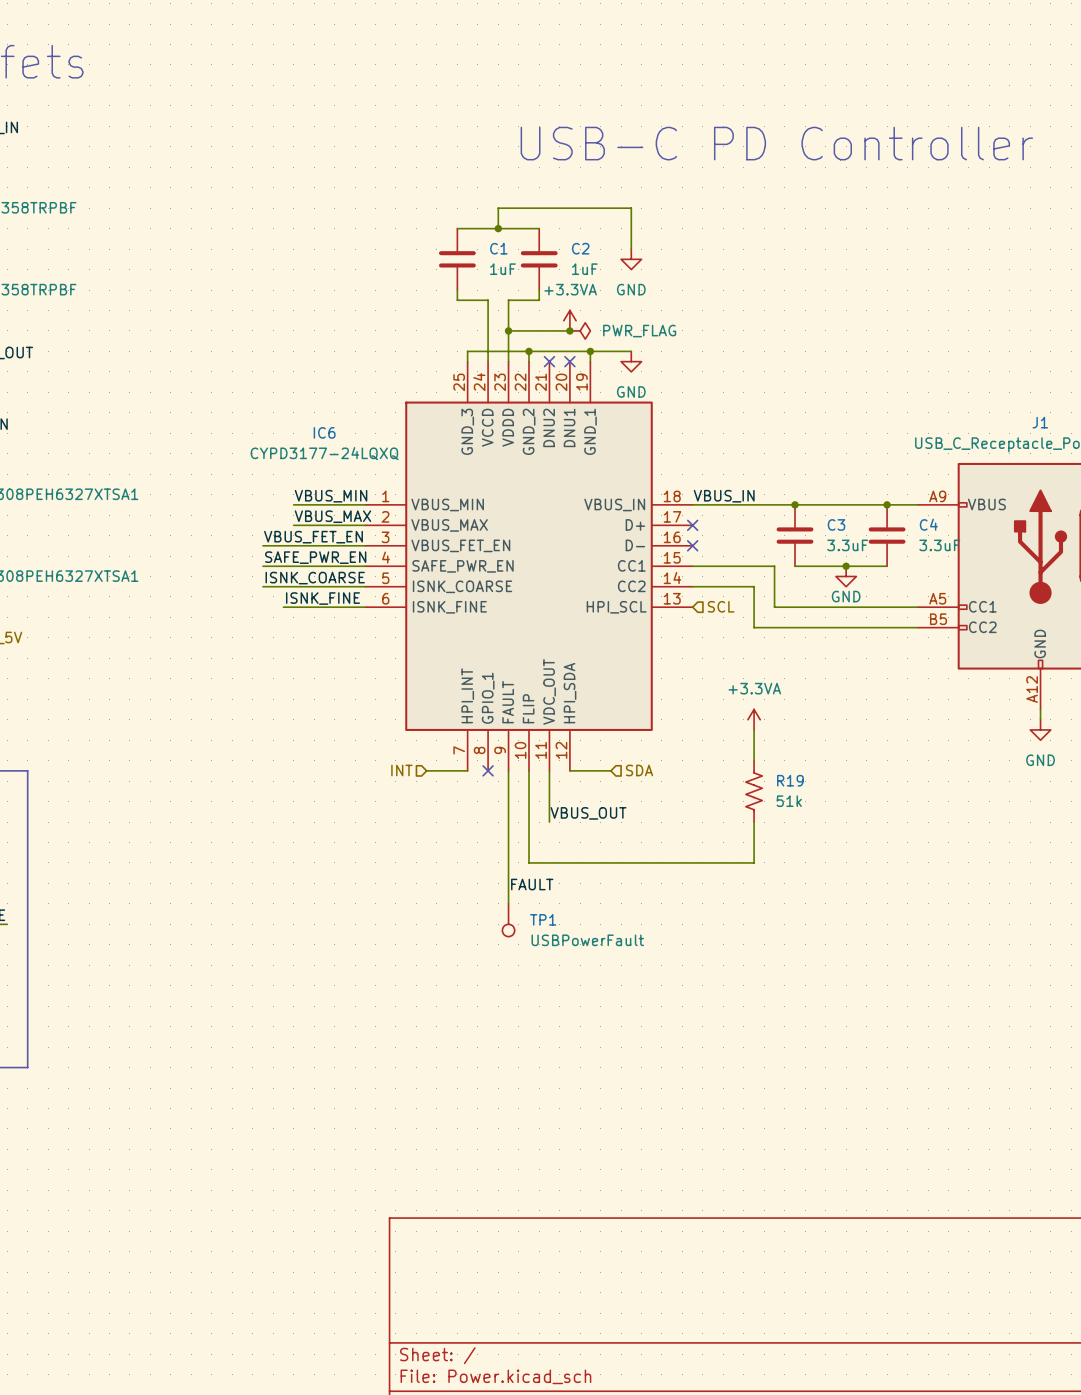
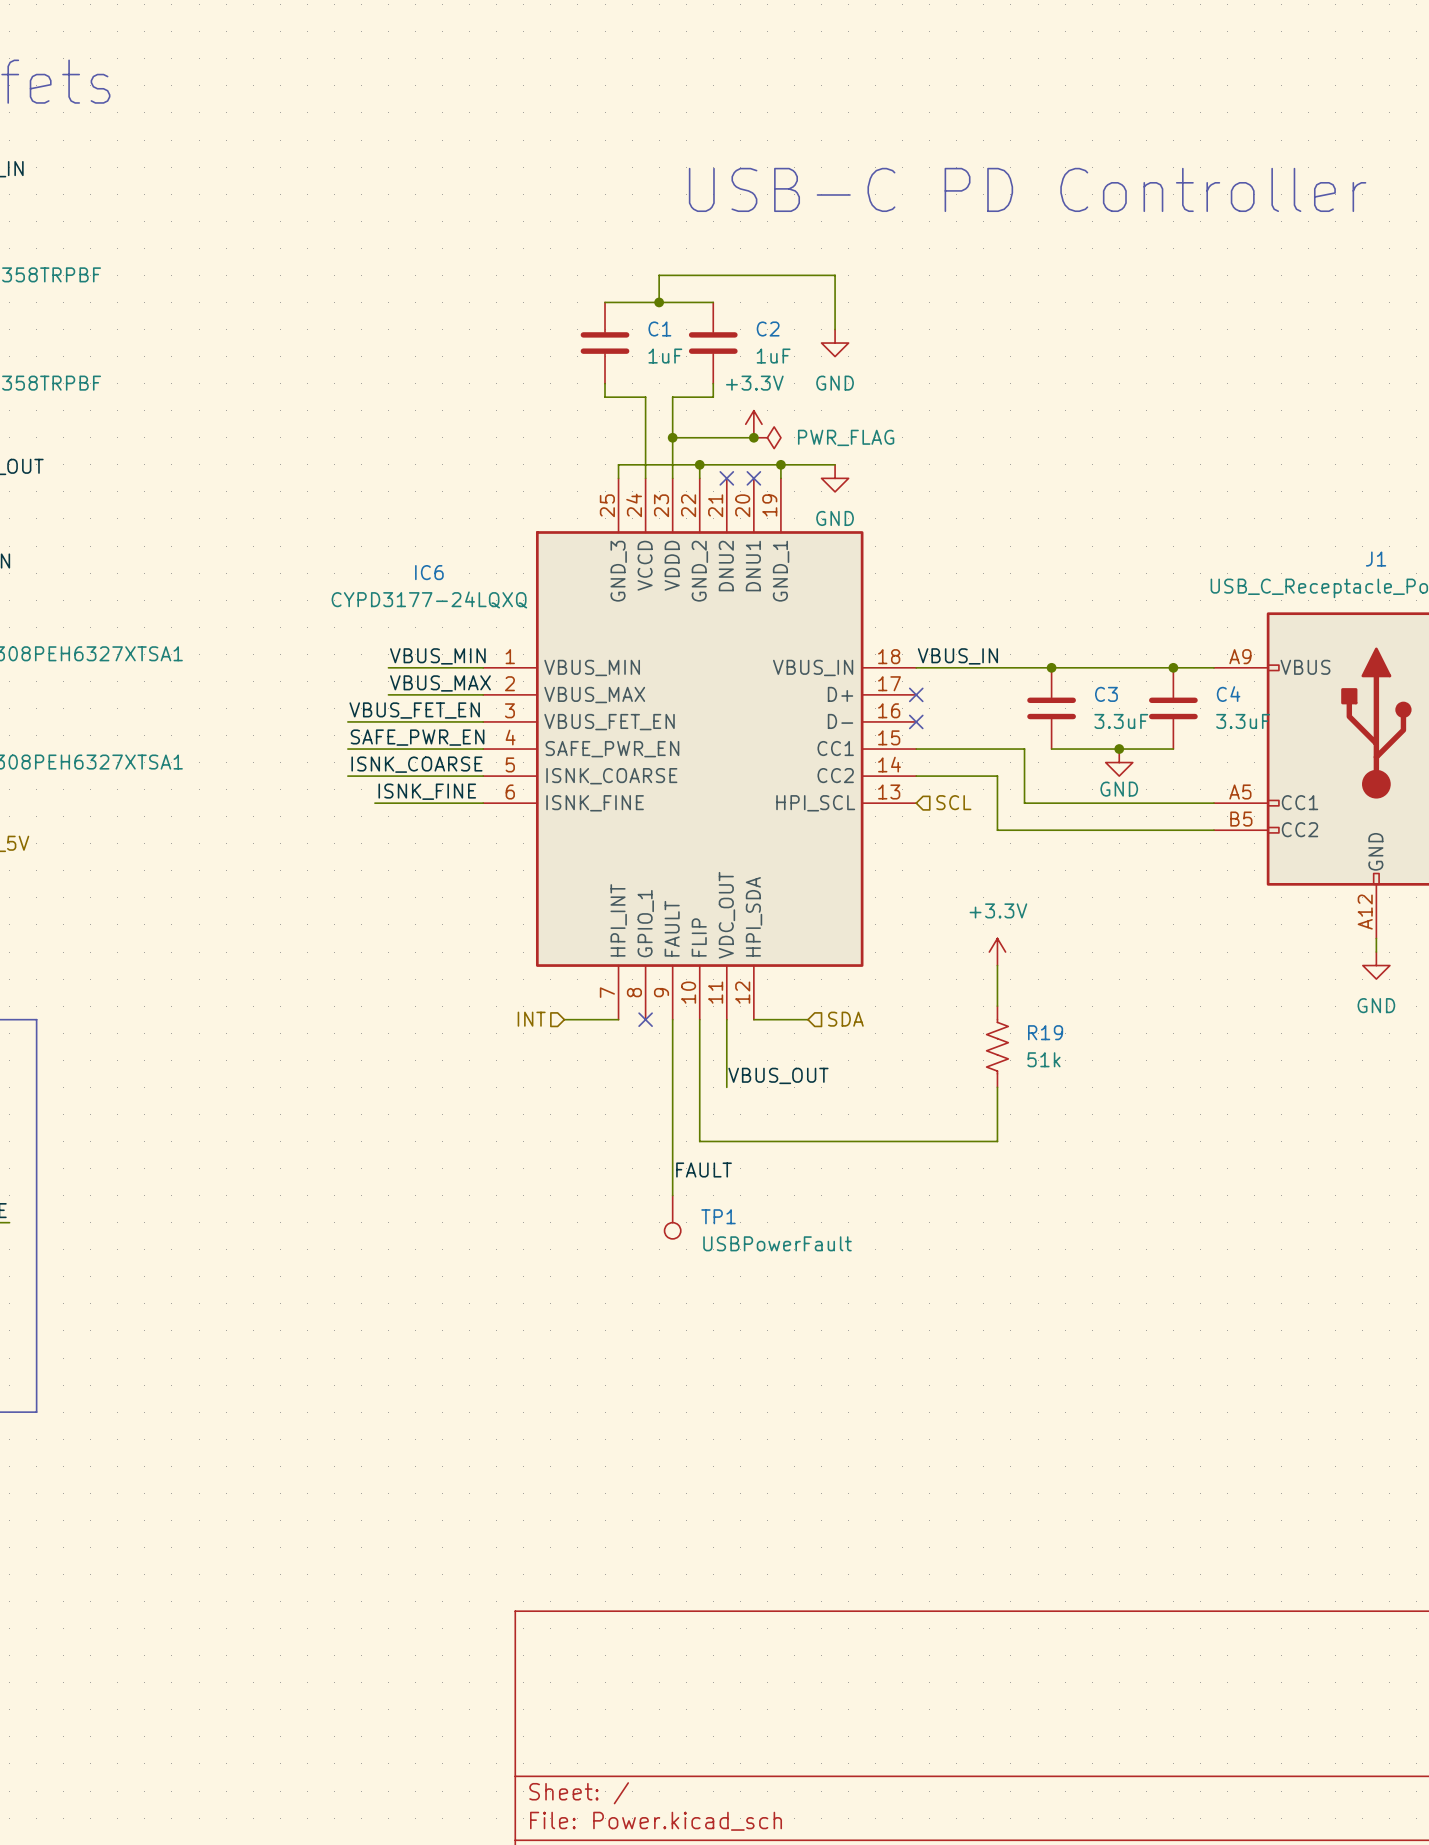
power symbol: +3.3VA (569, 320) -> +3.3V (753, 424)
power symbol: +3.3VA (754, 719) -> +3.3V (997, 952)

